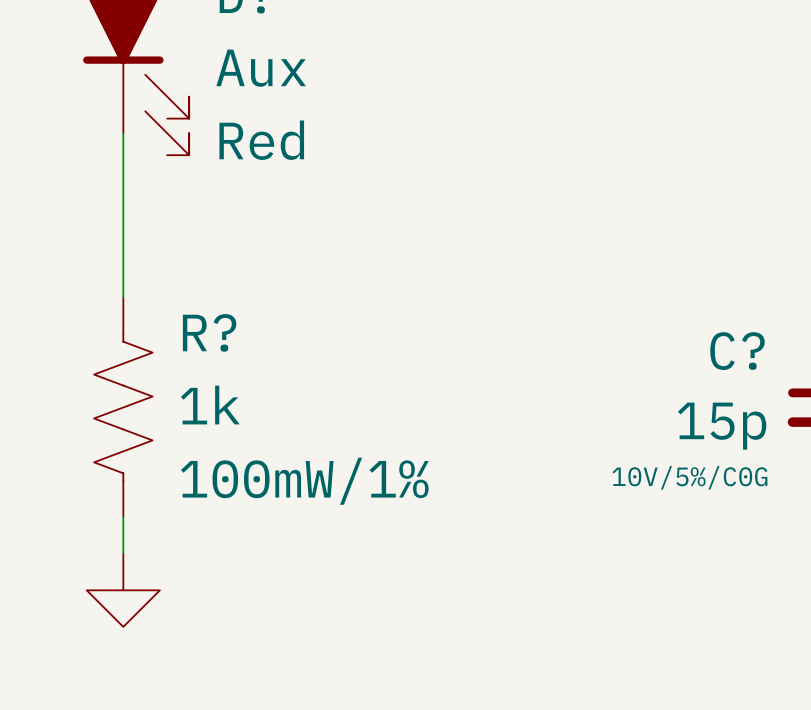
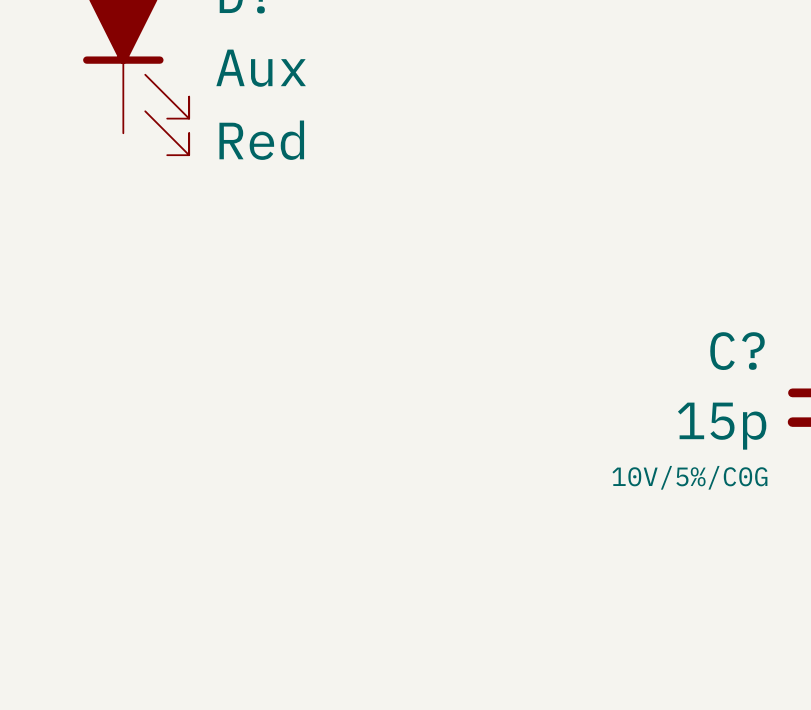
wire: (123, 133) (123, 297) -> none
R?: 1k (123, 407) -> none
wire: (123, 517) (123, 553) -> none
power symbol: (123, 590) -> none

